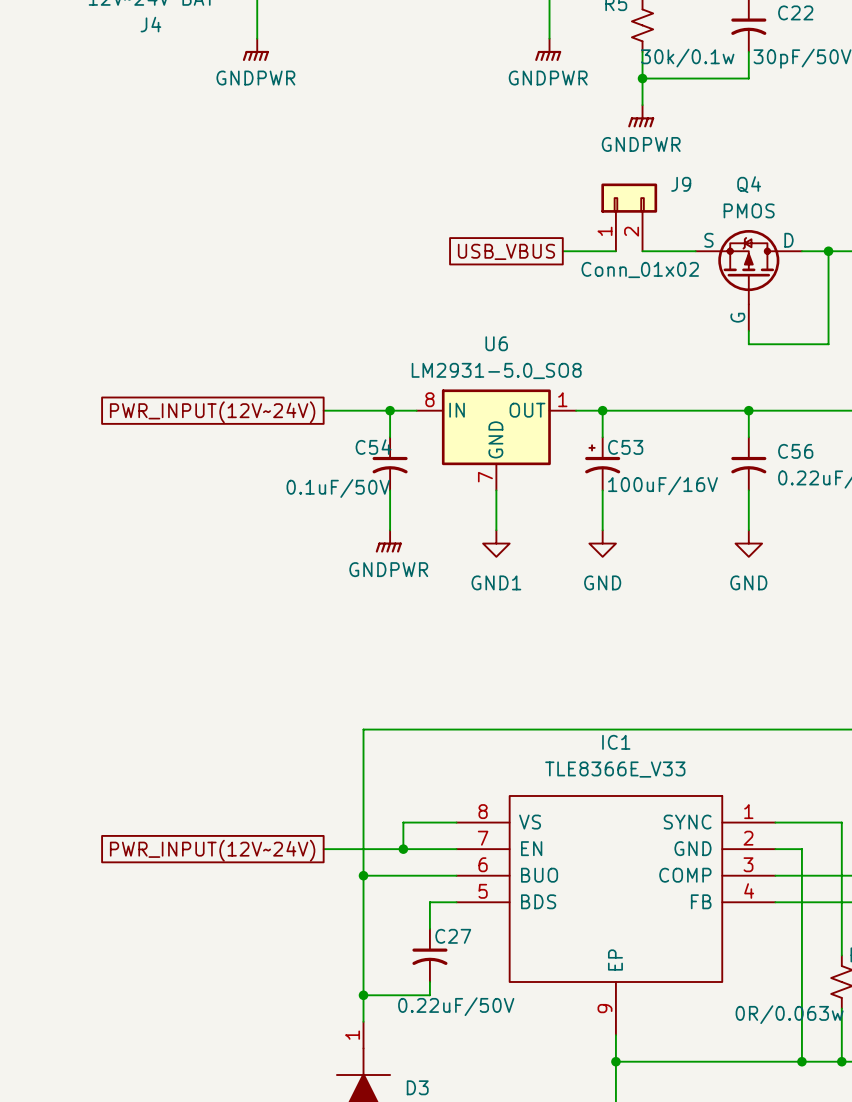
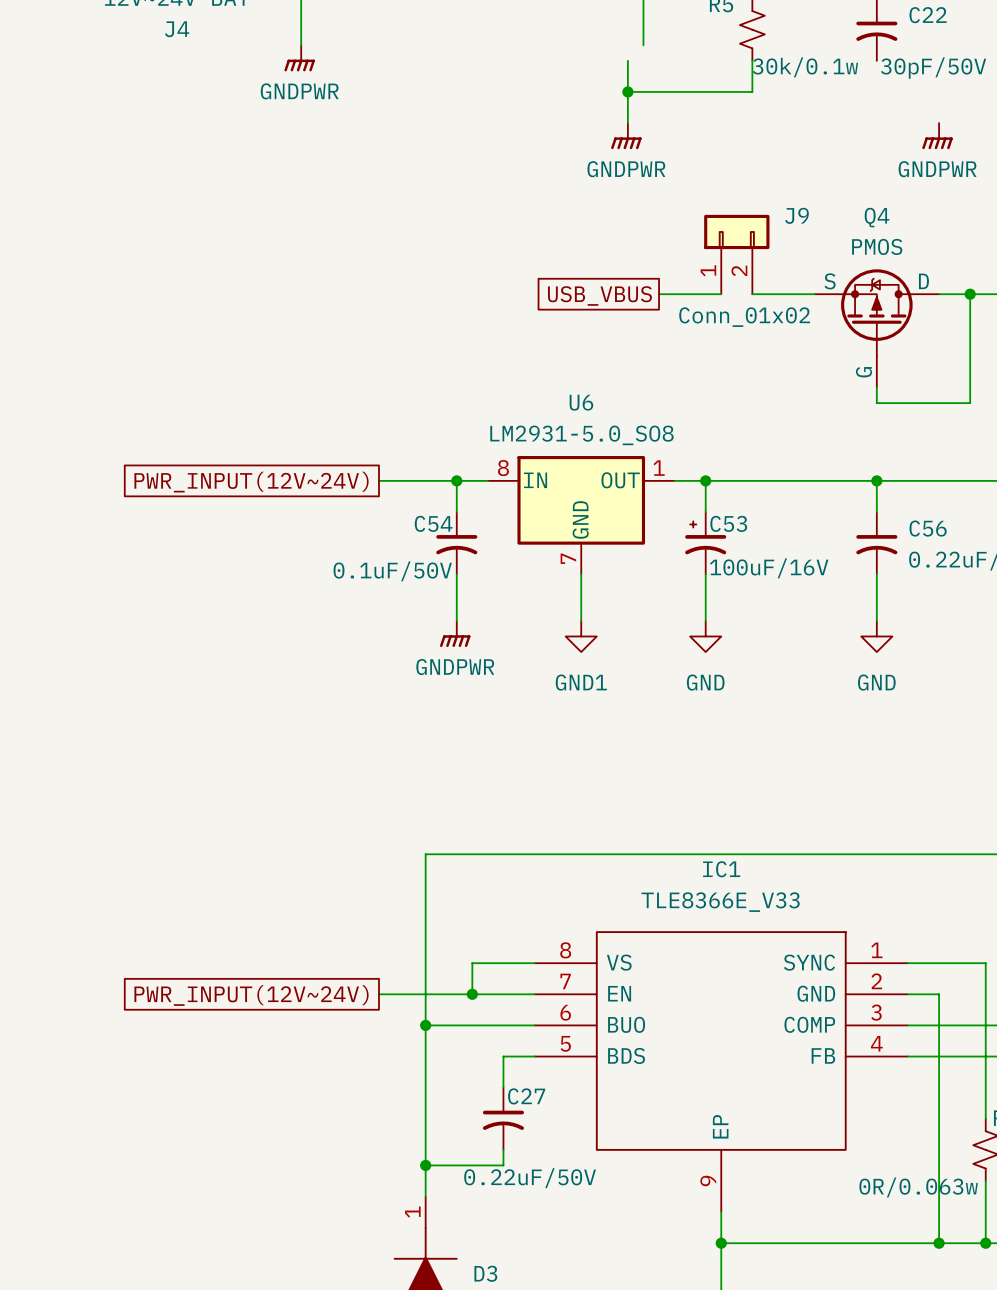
power symbol: GNDPWR (548, 49) -> none
wire: none -> (627, 60) (627, 123)
wire: (748, 51) (748, 78) (642, 78) (642, 105) -> none
wire: none -> (627, 91) (752, 91)
junction: none -> (627, 91)
junction: (642, 78) -> none
power symbol: none -> GNDPWR (626, 136)
power symbol: GNDPWR (641, 116) -> none
power symbol: none -> GNDPWR (937, 136)

